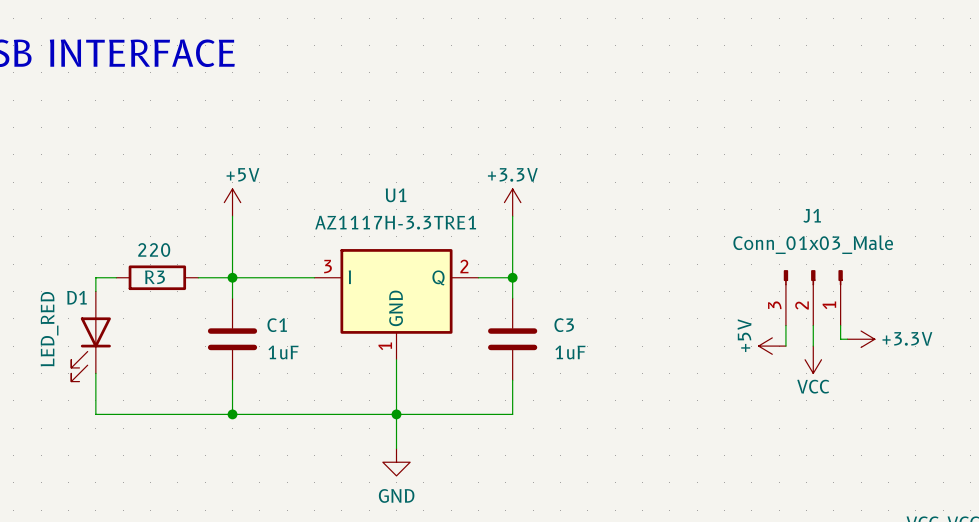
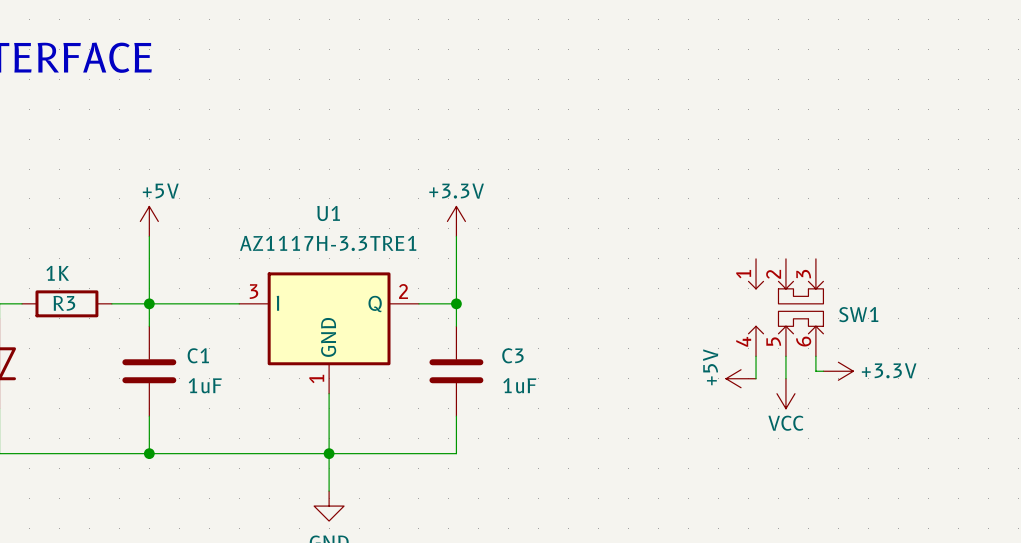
R3 value: 220 (154, 250) -> 1K (57, 273)
SW1: none -> (785, 307)
J1: Conn_01x03_Male (813, 297) -> none

